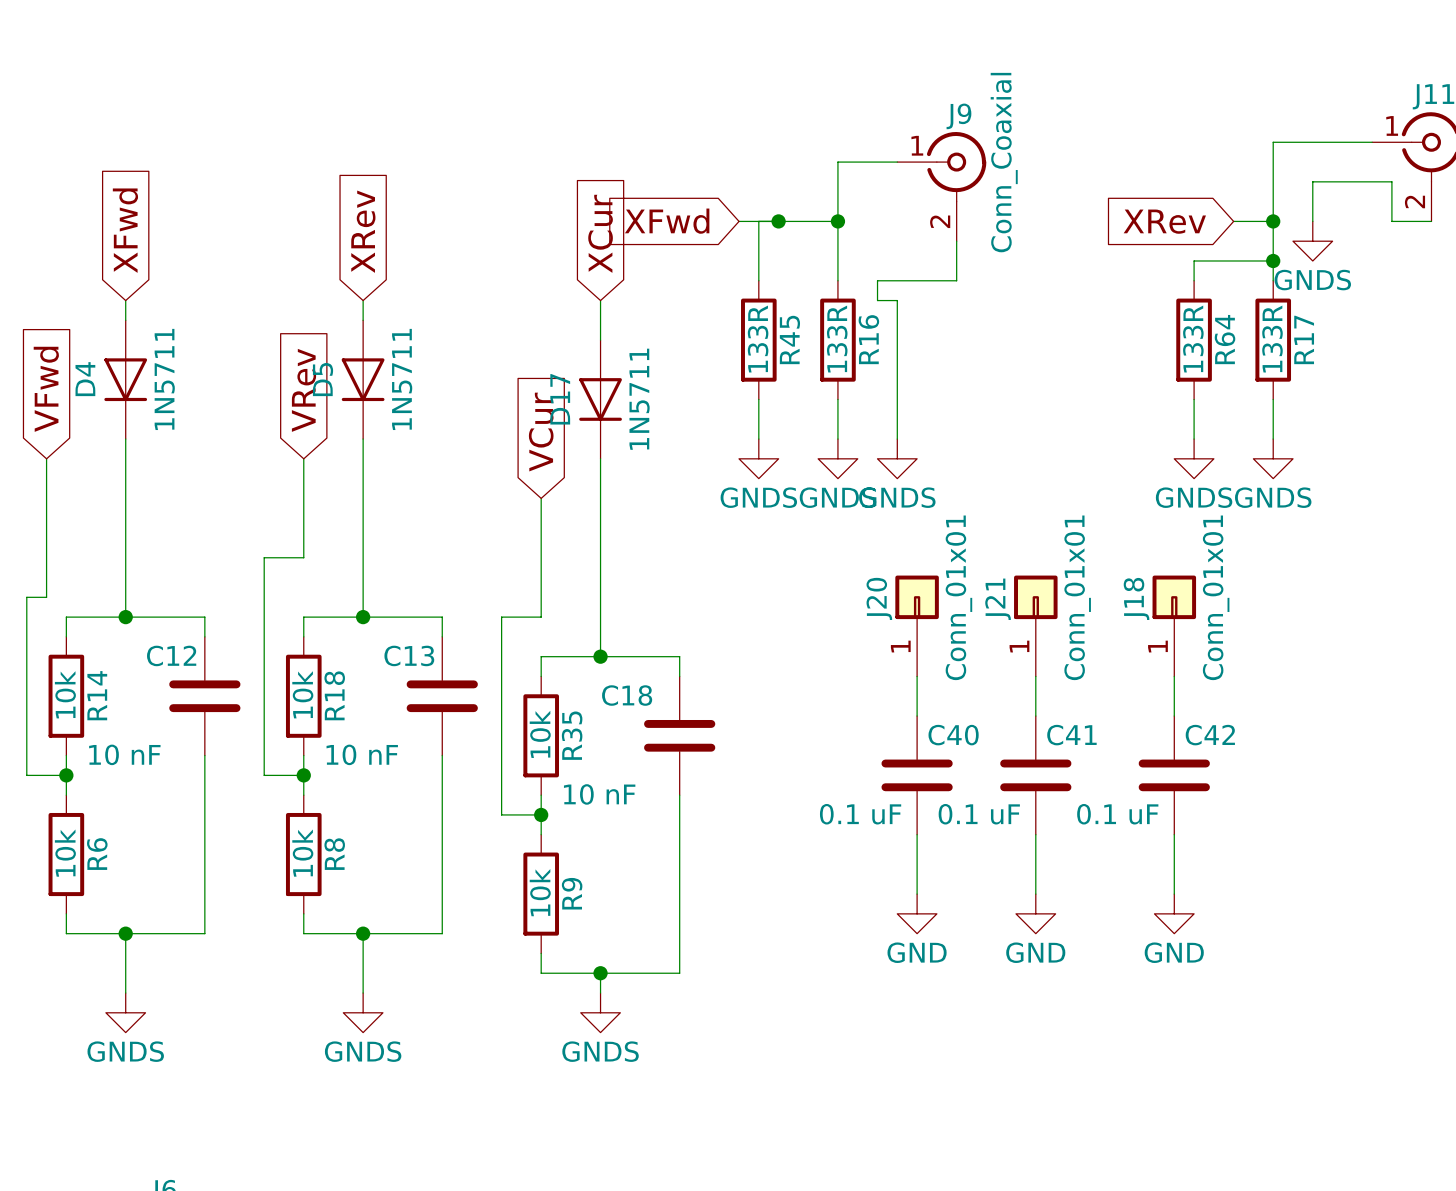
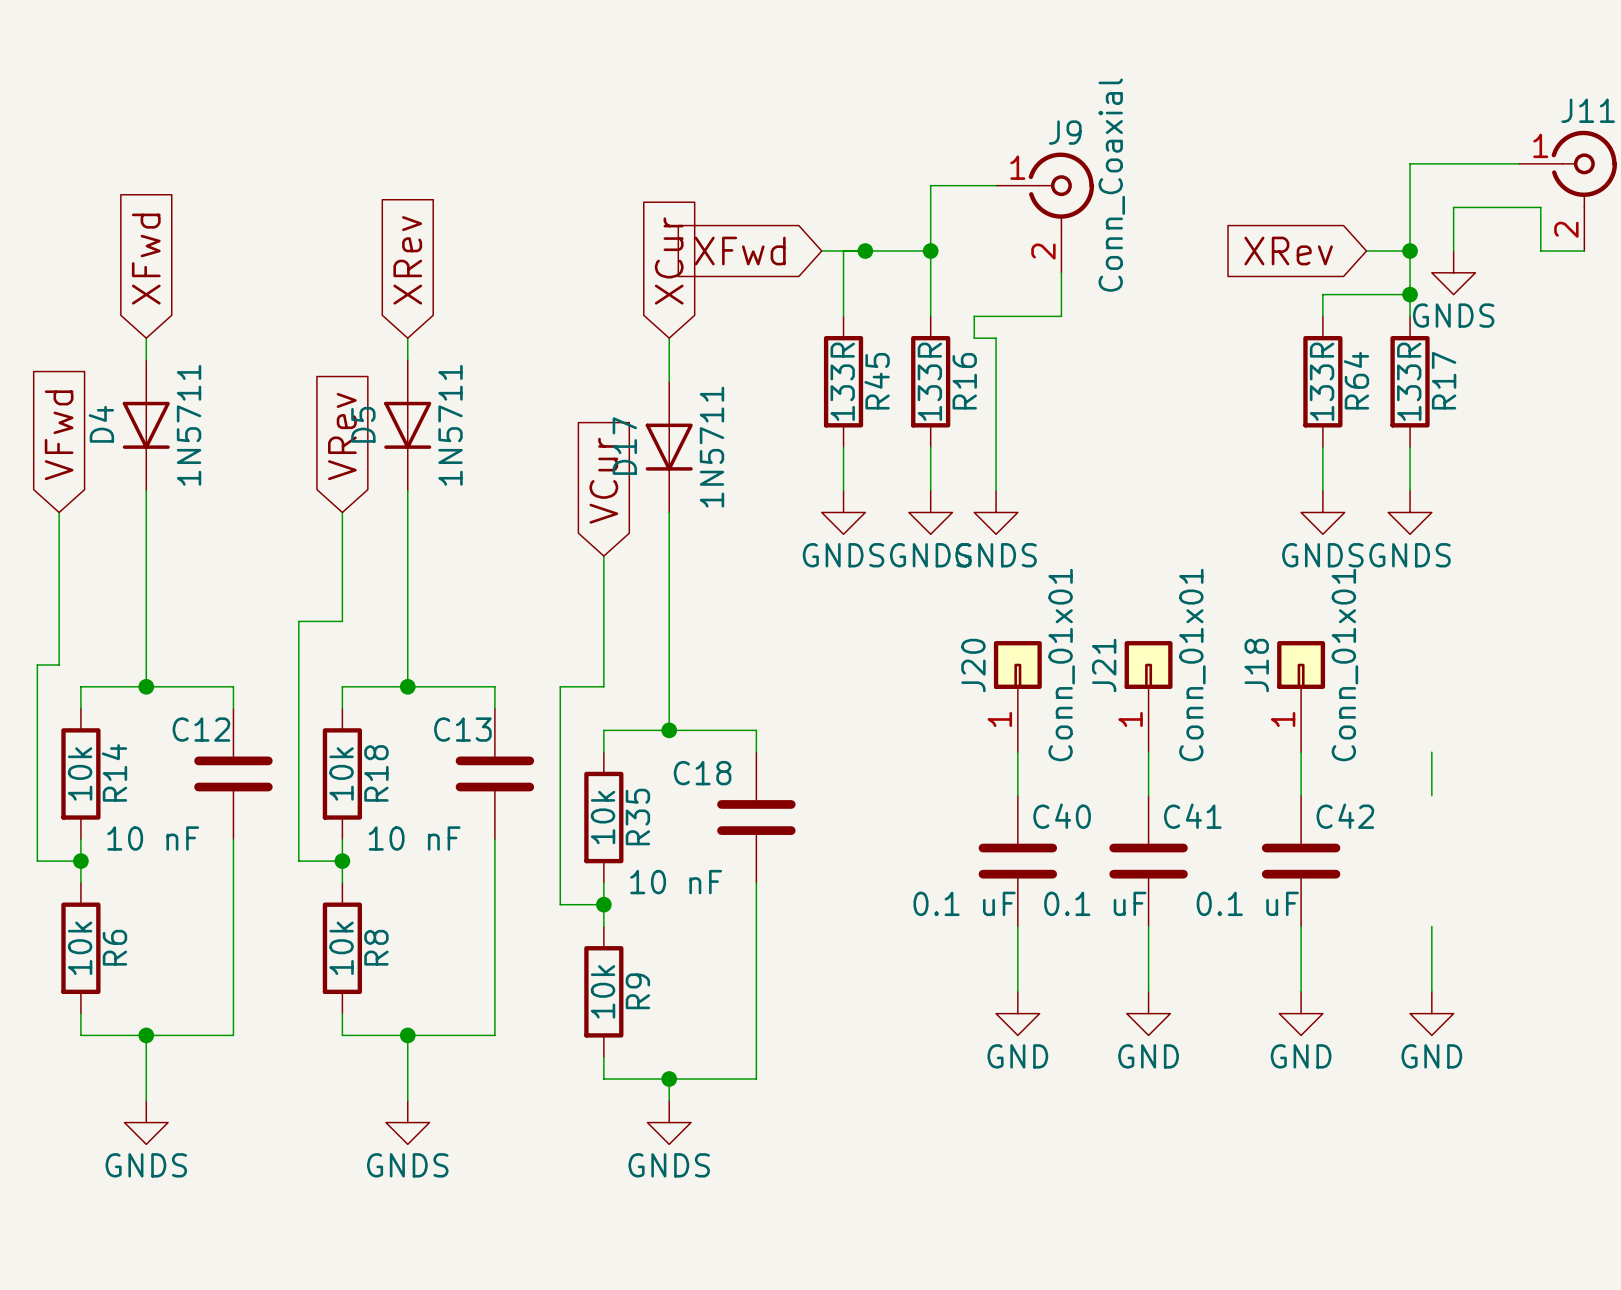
wire: none -> (1431, 752) (1431, 795)
wire: none -> (1431, 926) (1431, 991)
power symbol: none -> GND (1431, 1013)

